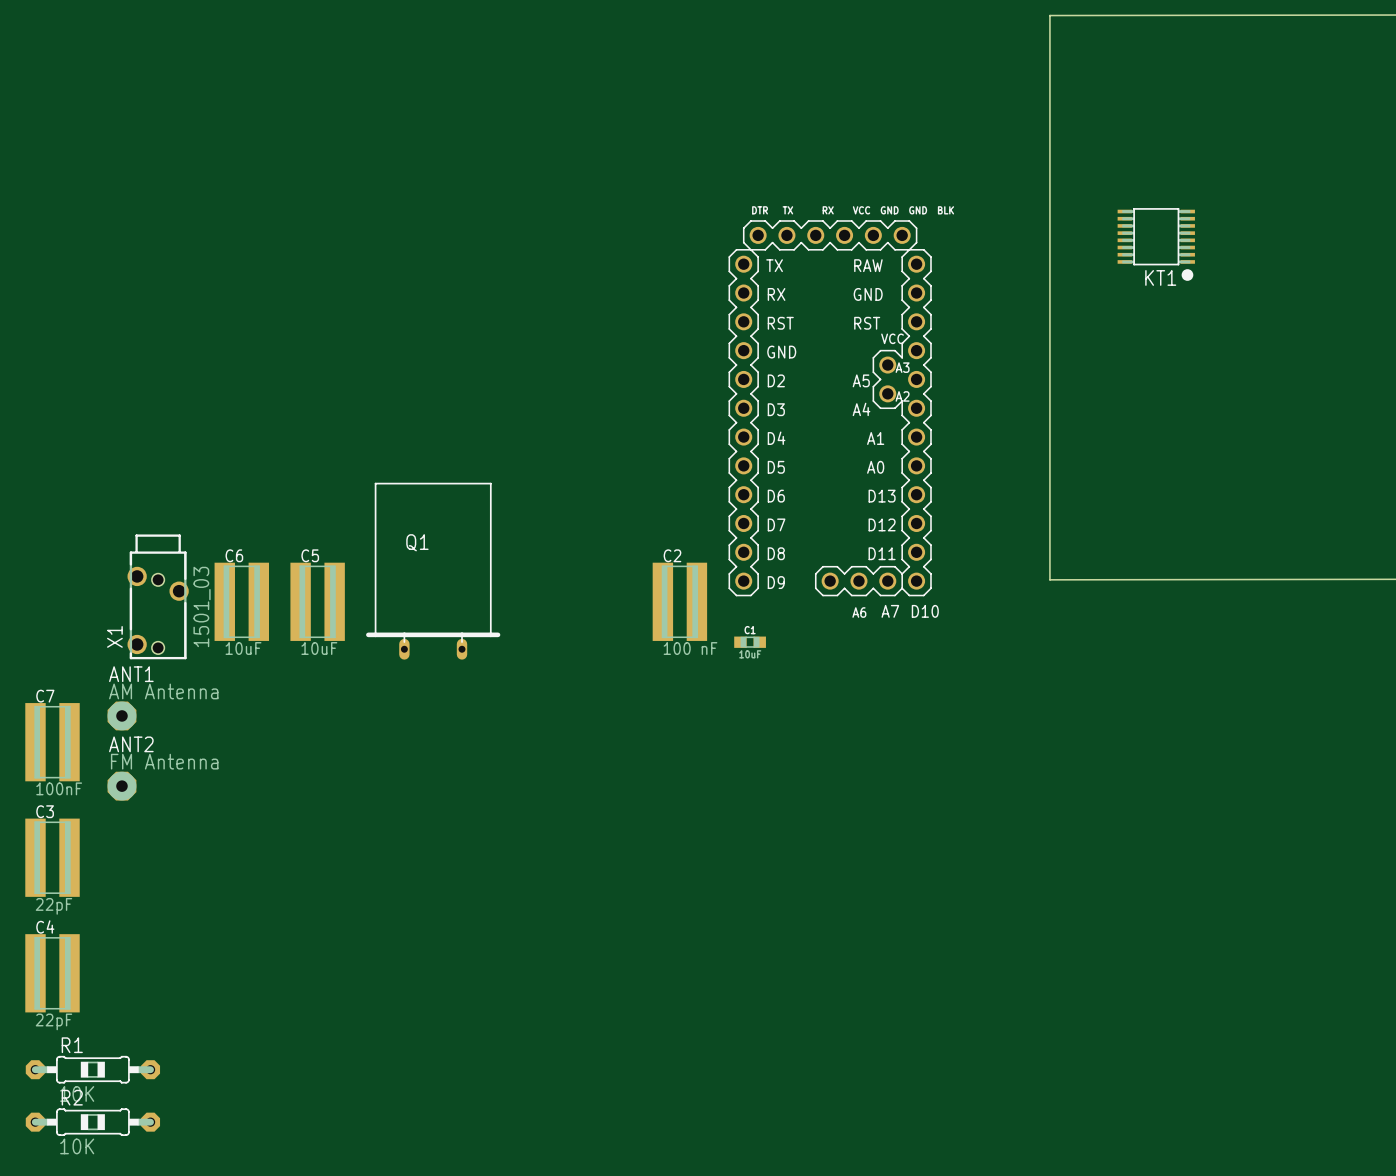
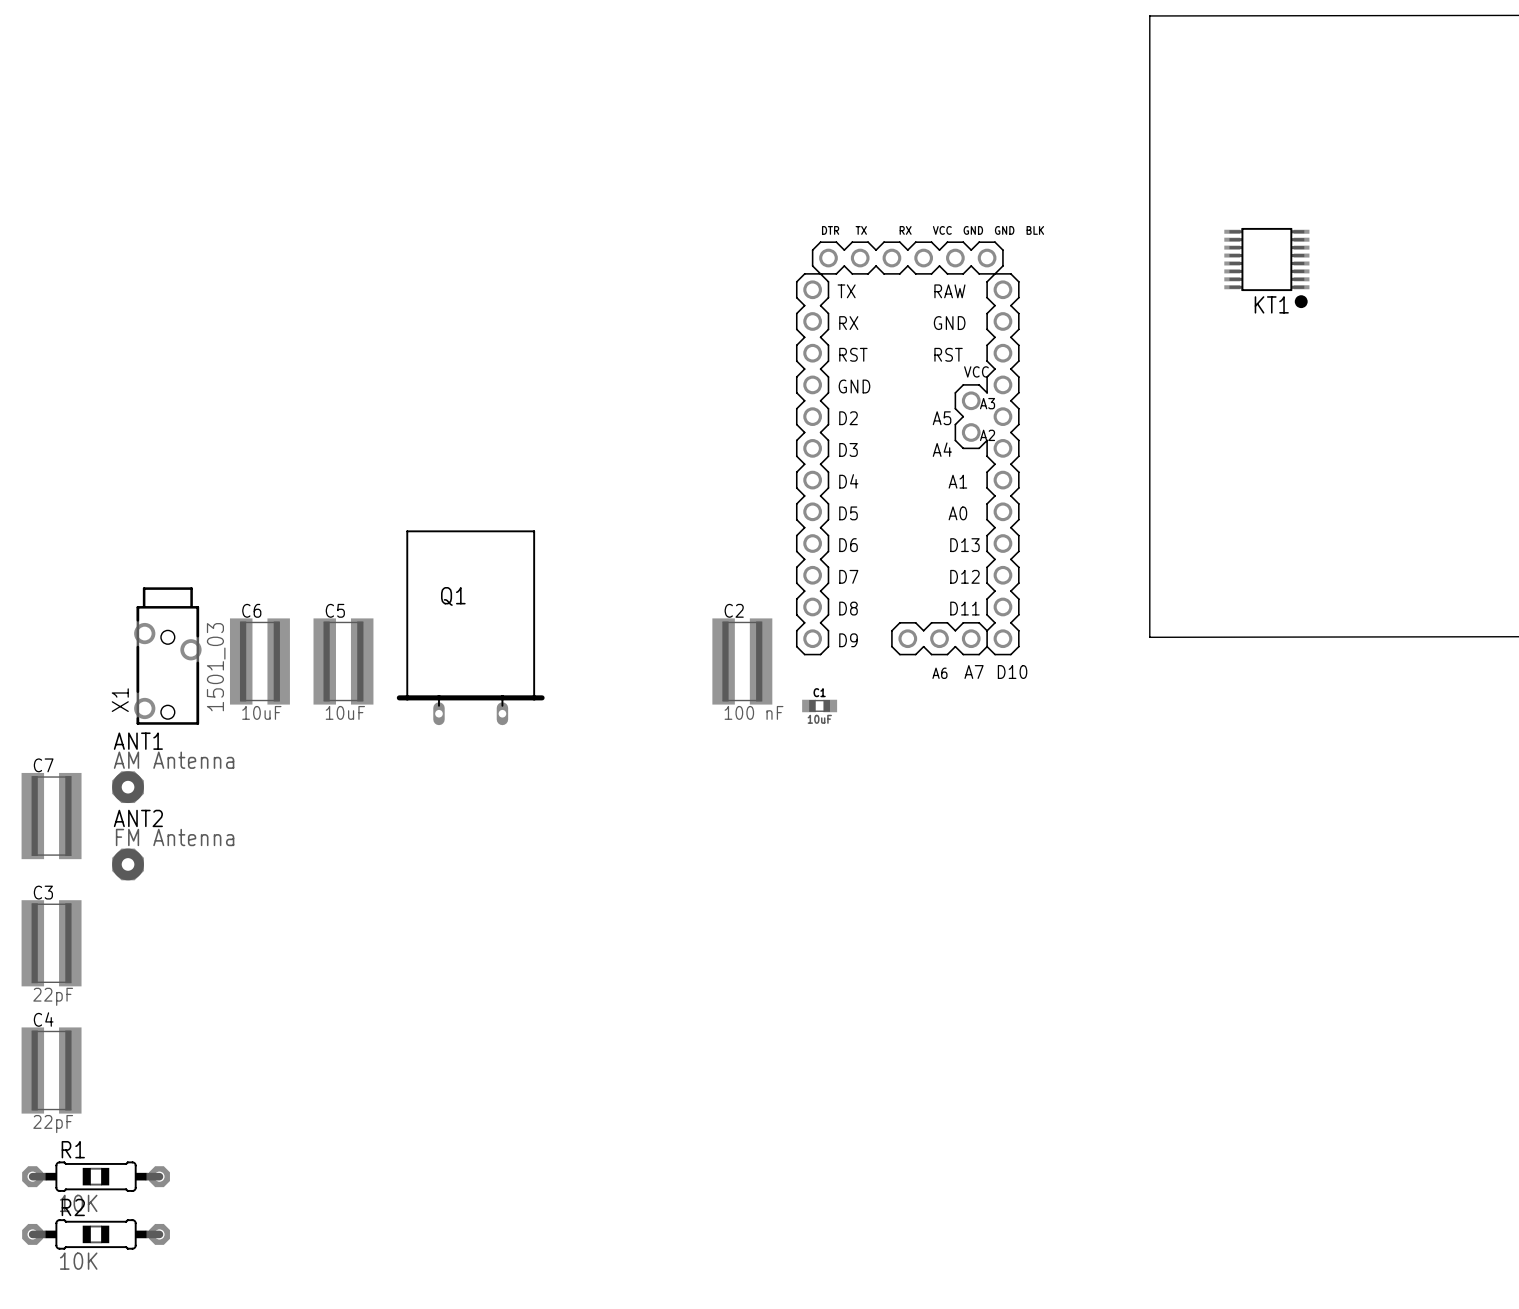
C7 value: 100nF (59, 788) -> none

